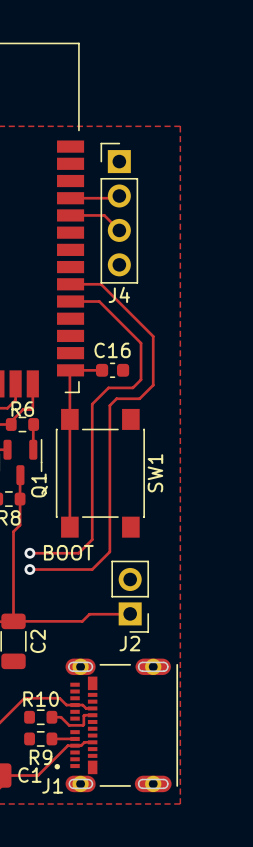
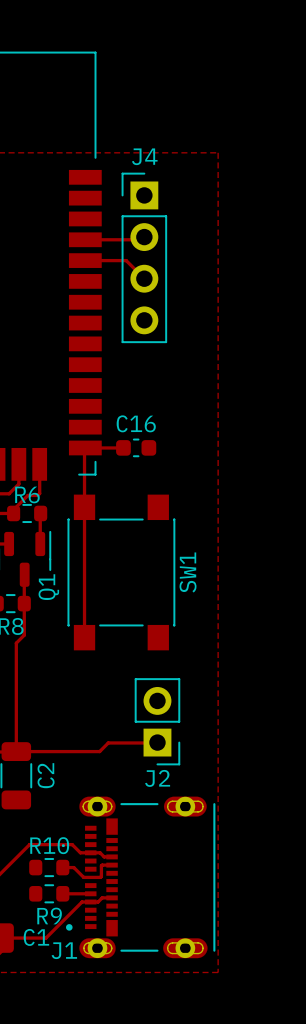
track: (70, 284) (101, 284) (153, 336) (153, 385) (139, 398) (116, 398) (109, 405) (109, 551) (92, 569) (29, 569) -> none
J4 name position: J4 (119, 294) -> J4 (144, 156)
track: (70, 301) (99, 301) (141, 343) (141, 379) (132, 387) (108, 387) (92, 404) (92, 539) (78, 553) (29, 553) -> none
text: BOOT (68, 552) -> none
via: (29, 553) -> none
via: (29, 569) -> none

